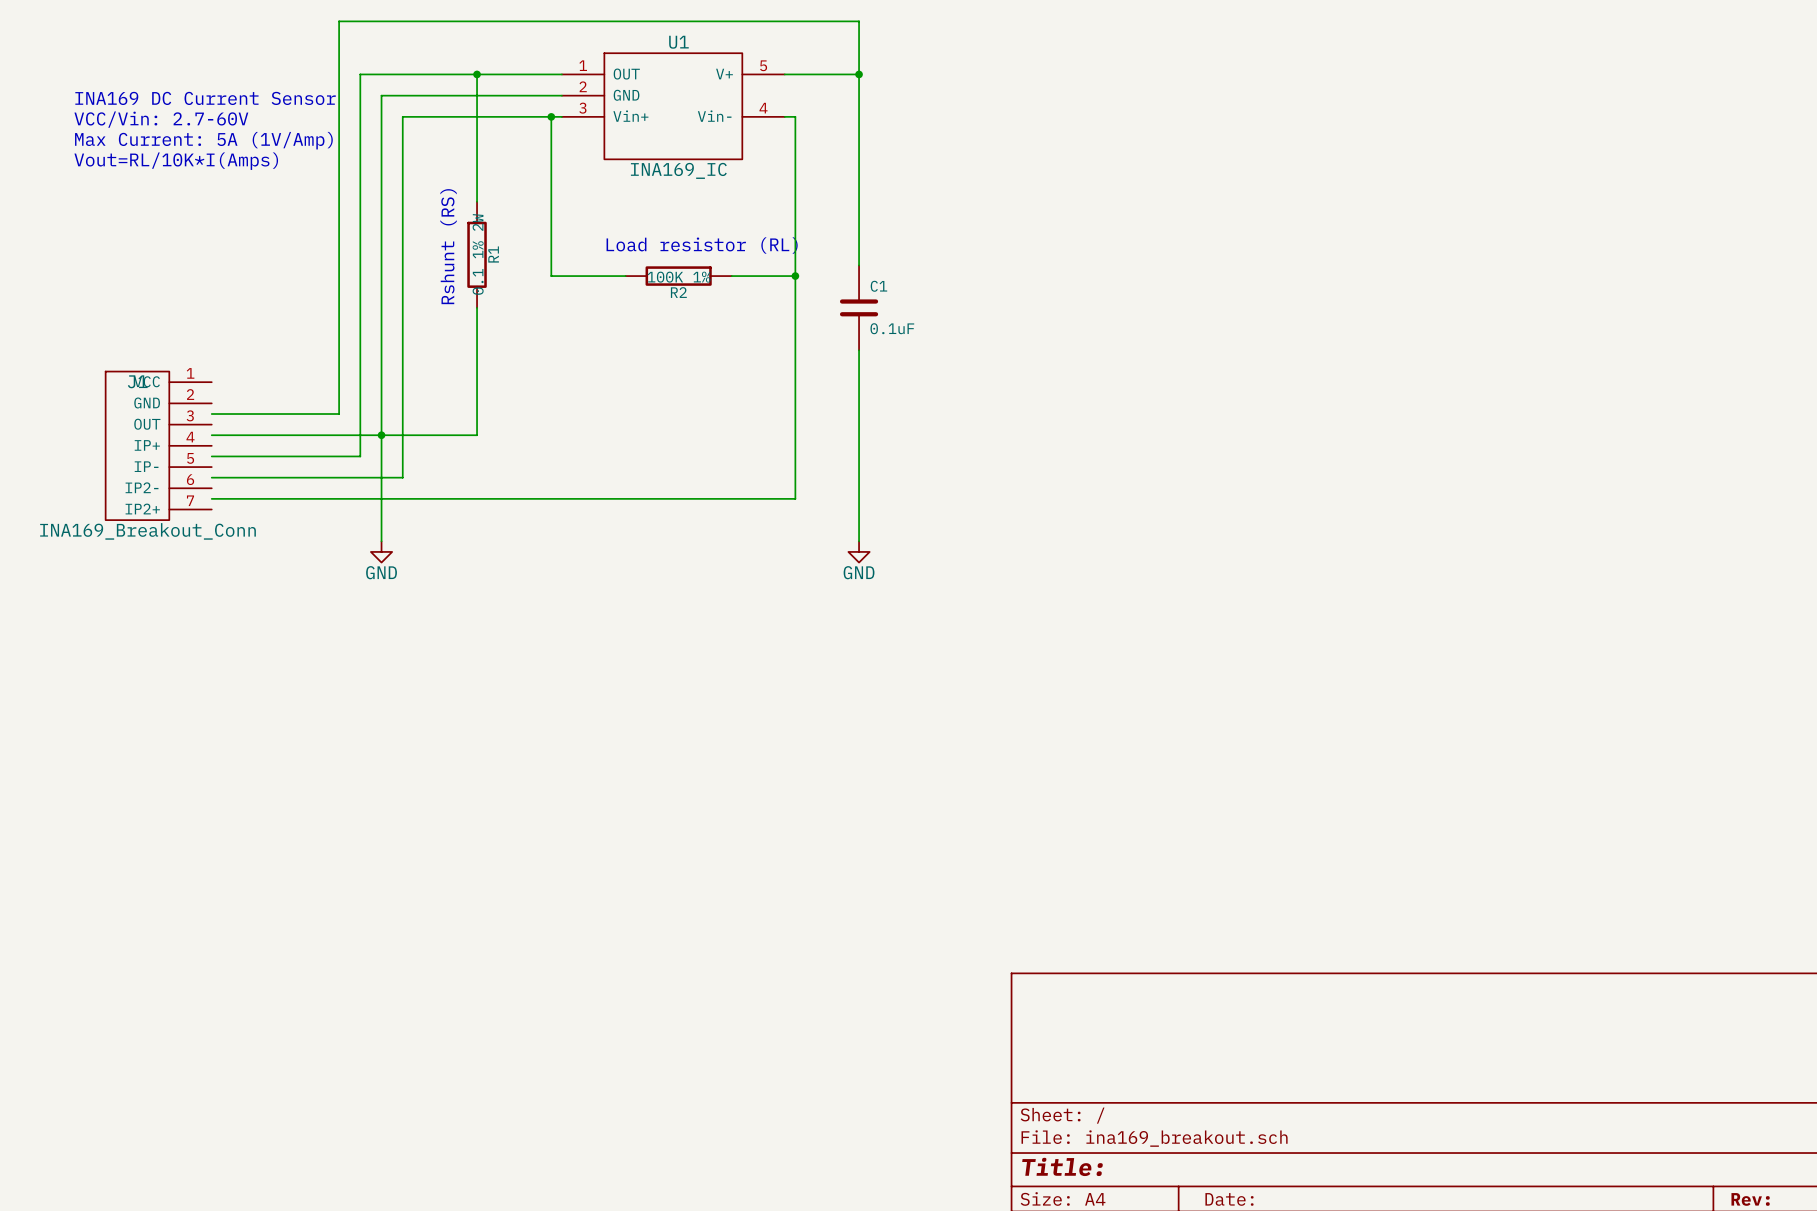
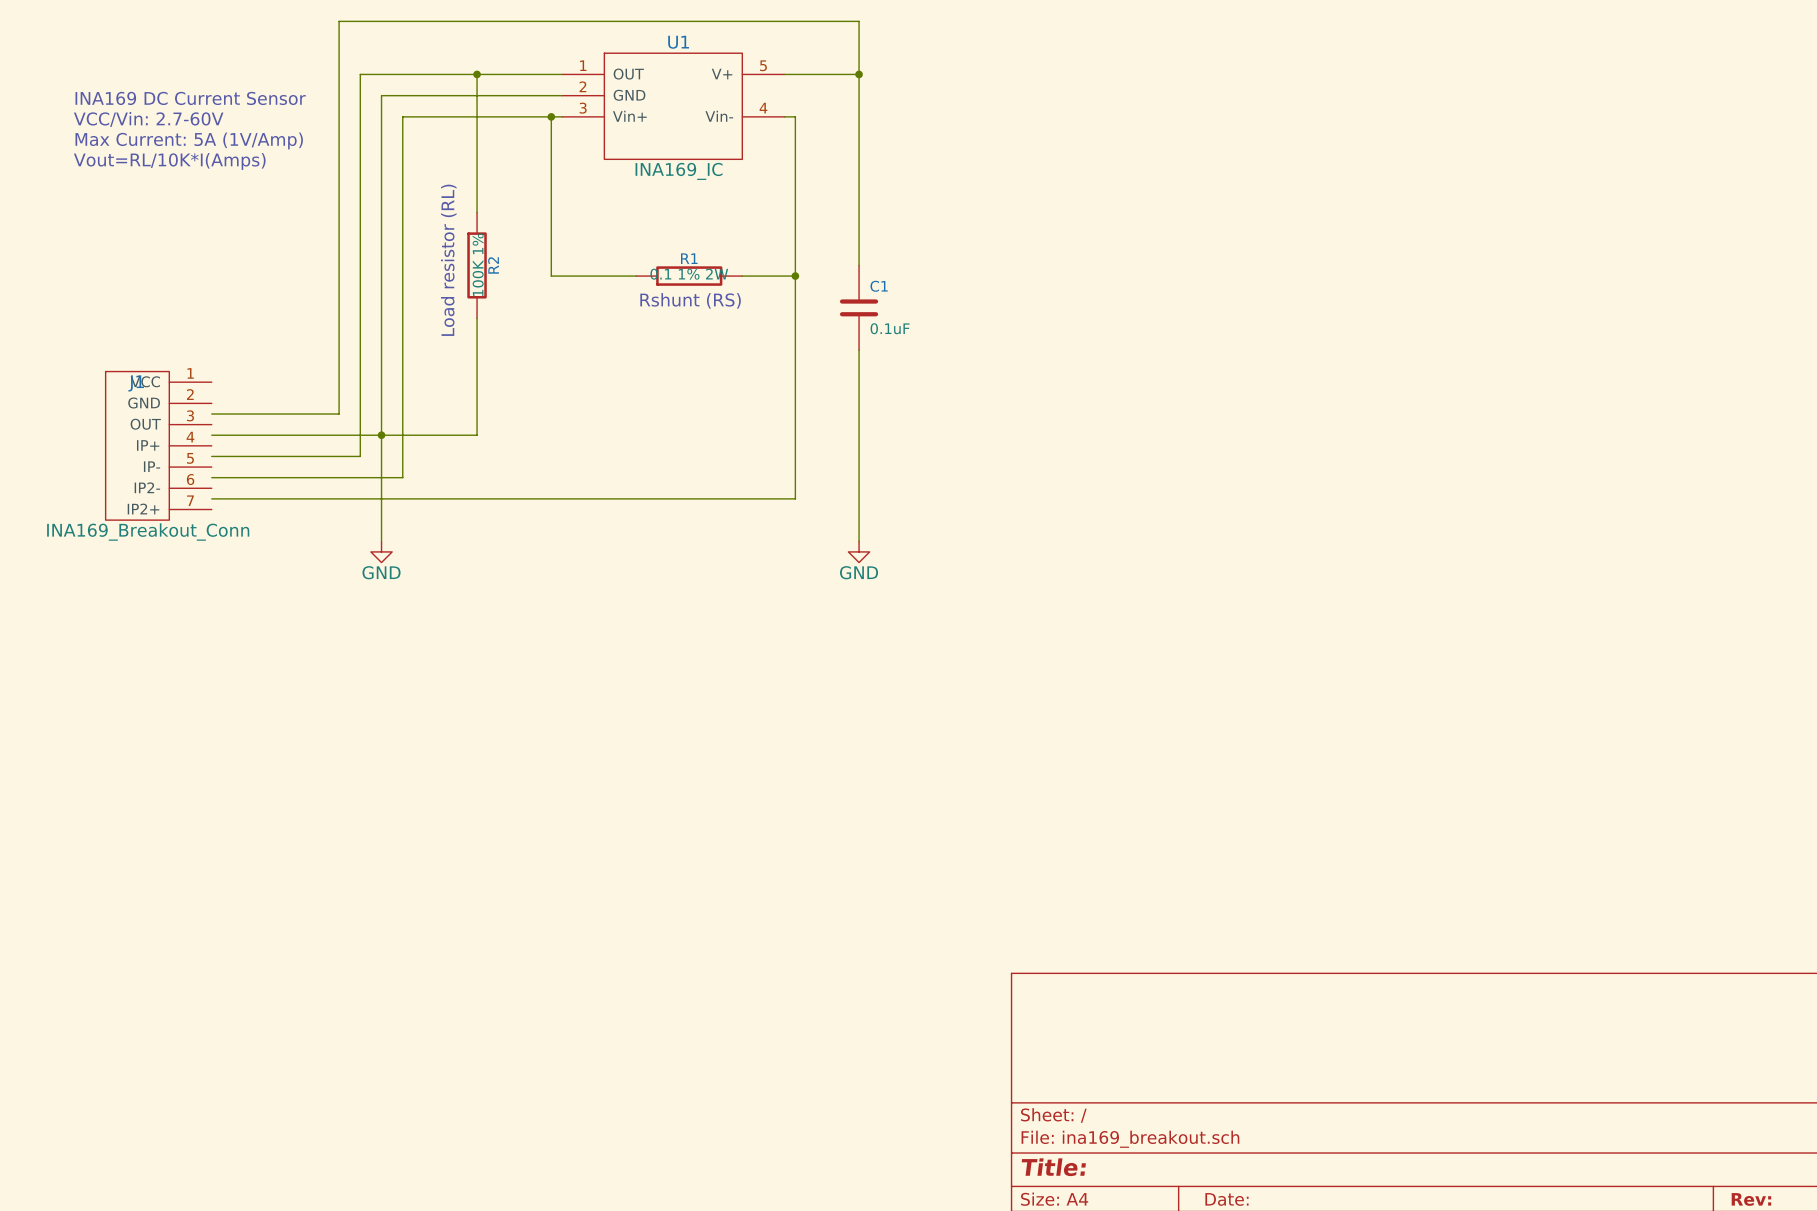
text rotation: 0° (702, 245) -> 90° counterclockwise (448, 260)
text position: Load resistor (RL) (702, 245) -> Load resistor (RL) (448, 260)
text: Rshunt (RS) (448, 246) -> none
R1 rotation: 0° (477, 254) -> 90° clockwise (689, 276)
R1 position: (477, 254) -> (689, 276)
R1 name position: R1 (493, 254) -> R1 (689, 258)
R2 rotation: 0° (678, 276) -> 90° clockwise (477, 265)
R2 position: (678, 276) -> (477, 265)
R2 name position: R2 (678, 292) -> R2 (493, 265)
text: none -> Rshunt (RS) (690, 300)

